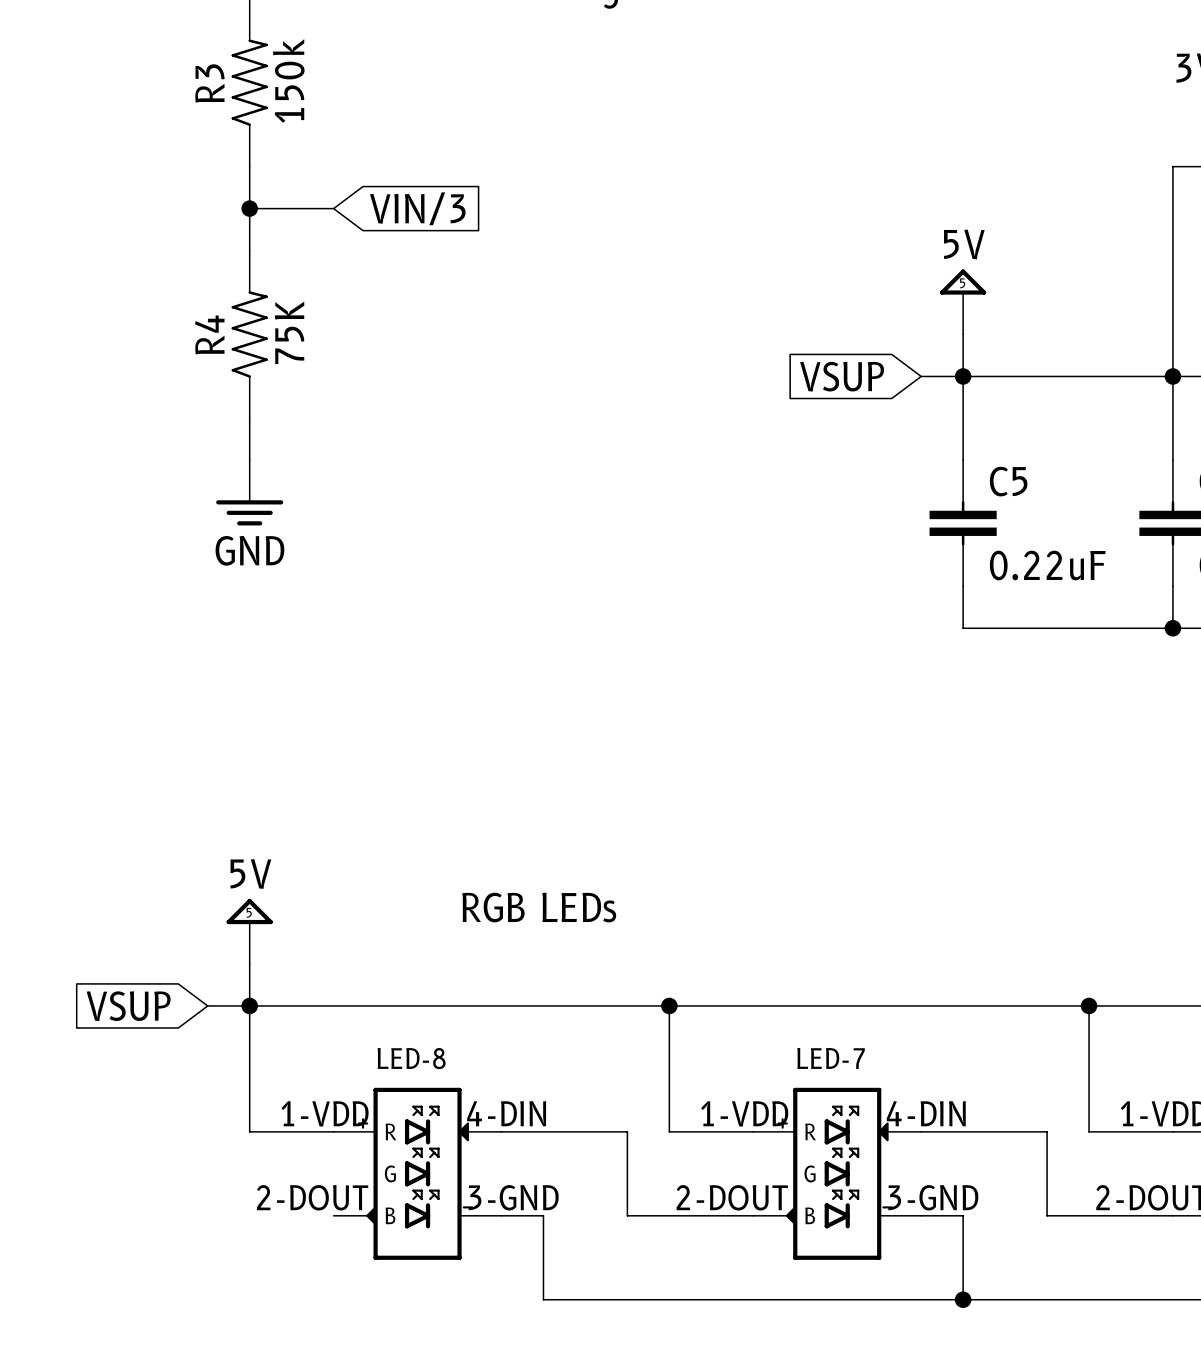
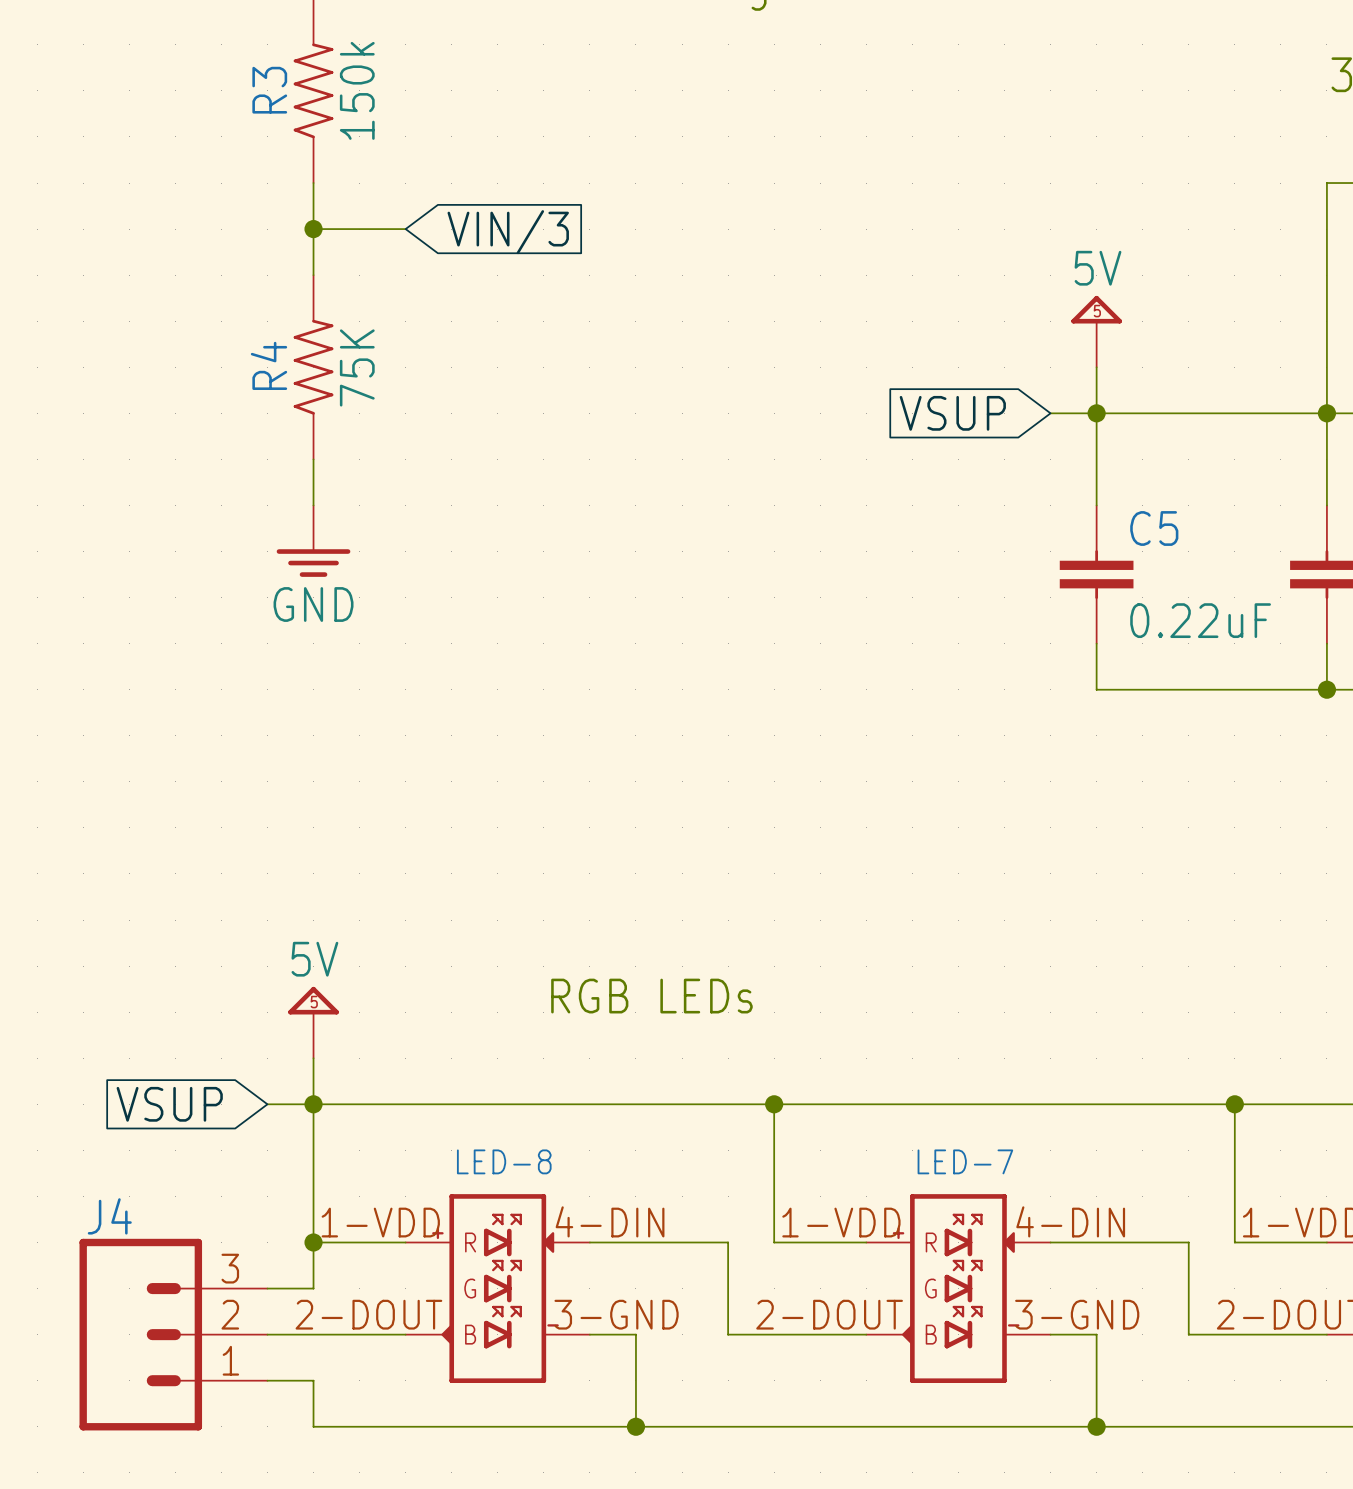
wire: none -> (313, 1242) (313, 1288) (267, 1288)
junction: none -> (313, 1242)
J4: none -> (173, 1334)
wire: none -> (267, 1334) (405, 1334)
wire: none -> (267, 1380) (313, 1380) (313, 1426) (635, 1426)
junction: none -> (635, 1426)

